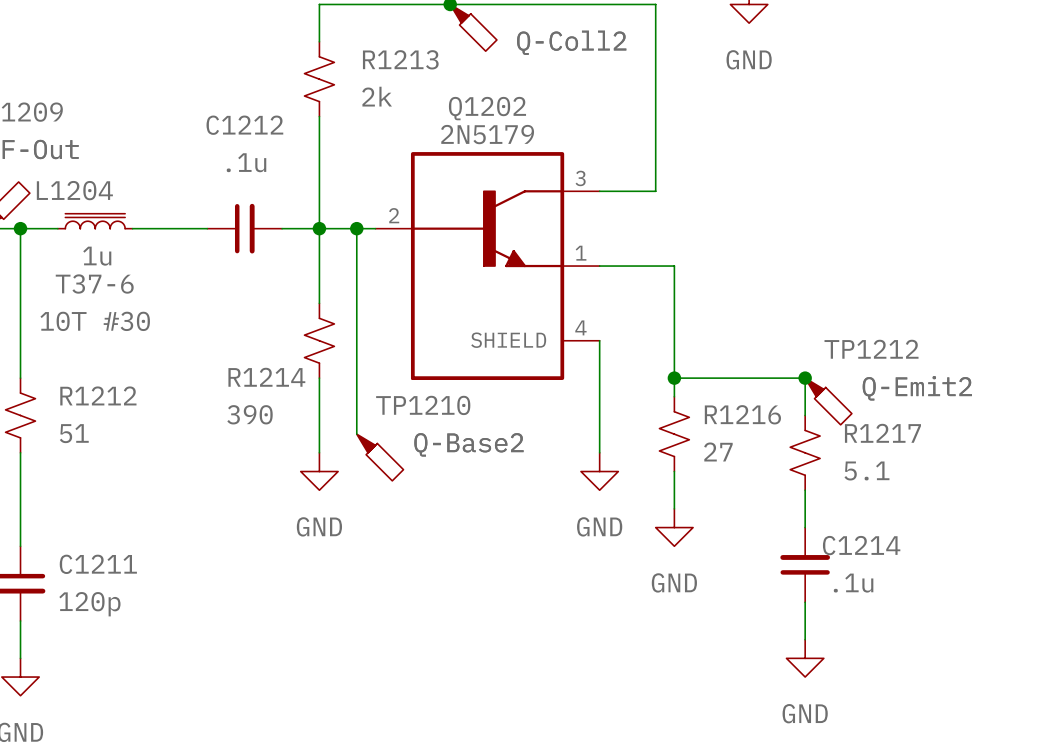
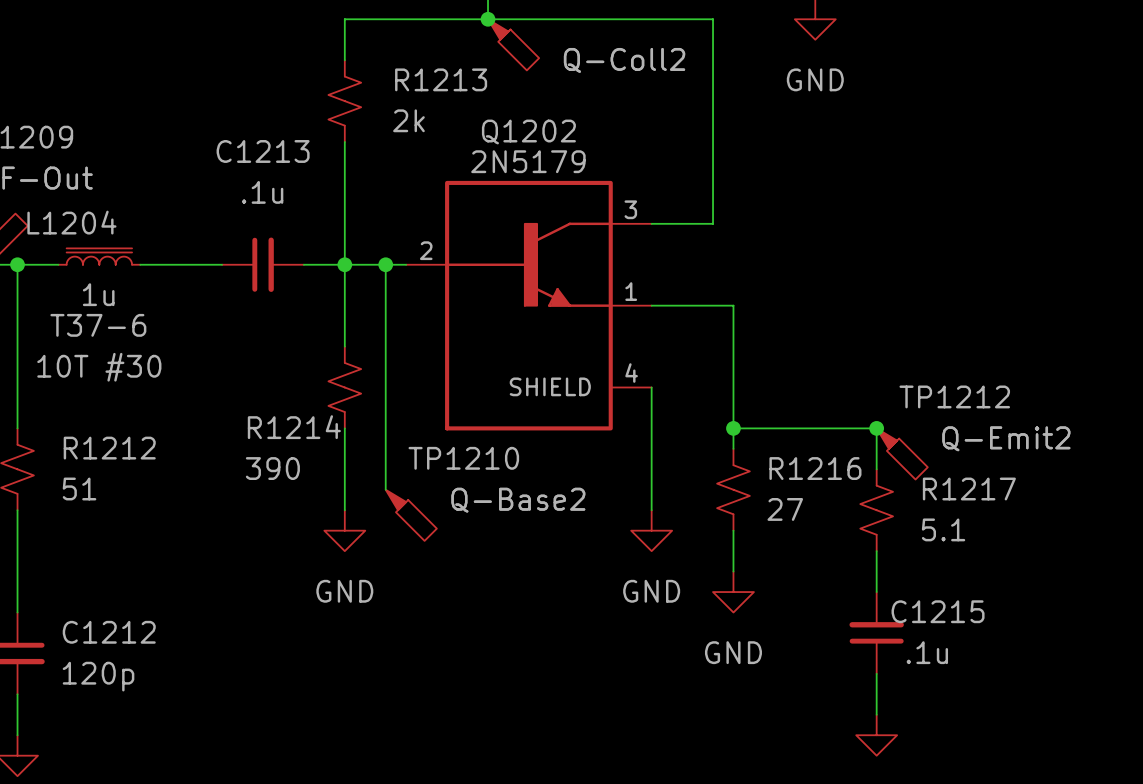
C1212 name: C1212 (244, 125) -> C1213 (263, 151)
C1214 name: C1214 (861, 545) -> C1215 (938, 611)
C1211 name: C1211 (98, 564) -> C1212 (109, 632)

